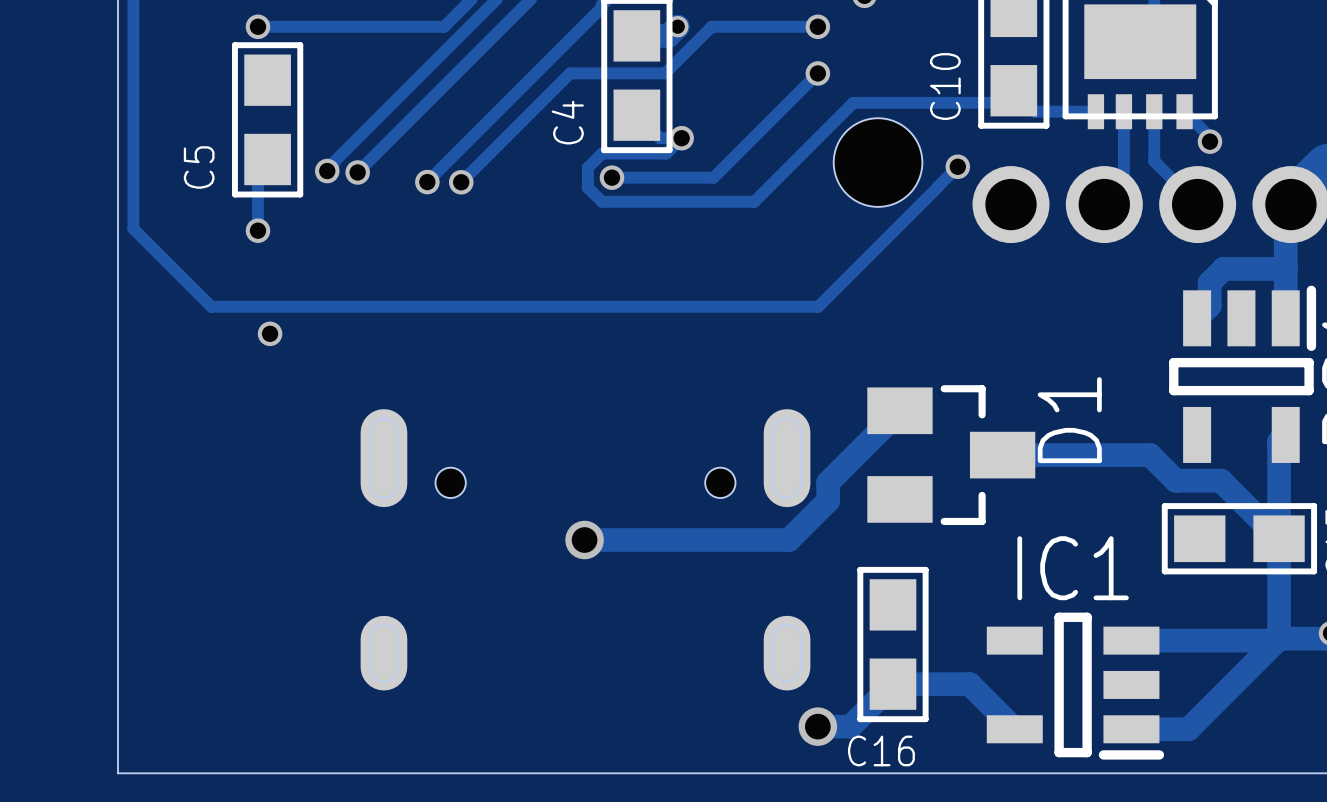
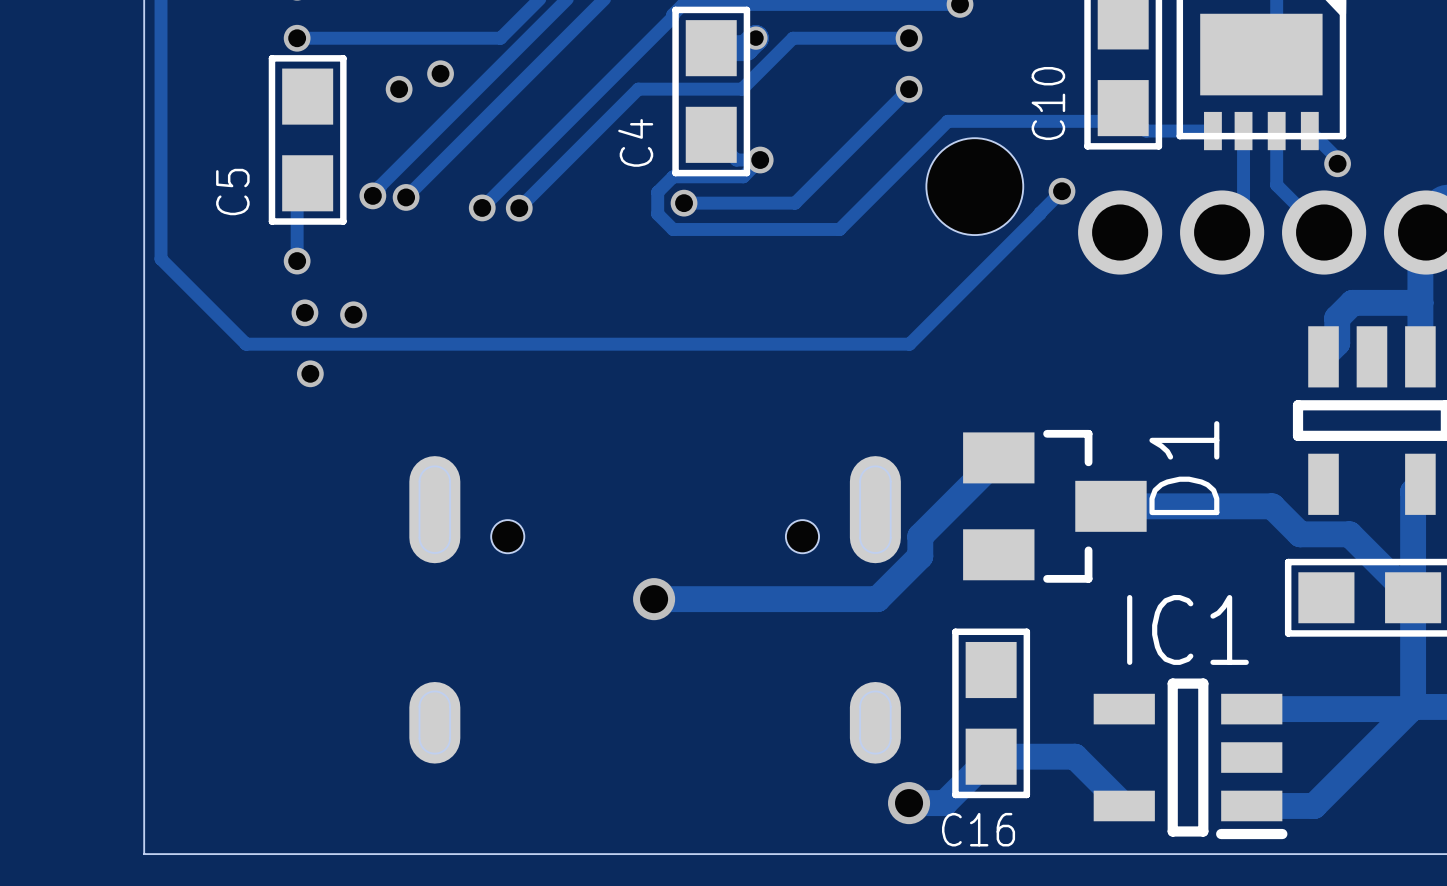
via: none -> (440, 73)
via: none -> (399, 89)
via: none -> (304, 312)
via: none -> (353, 314)

